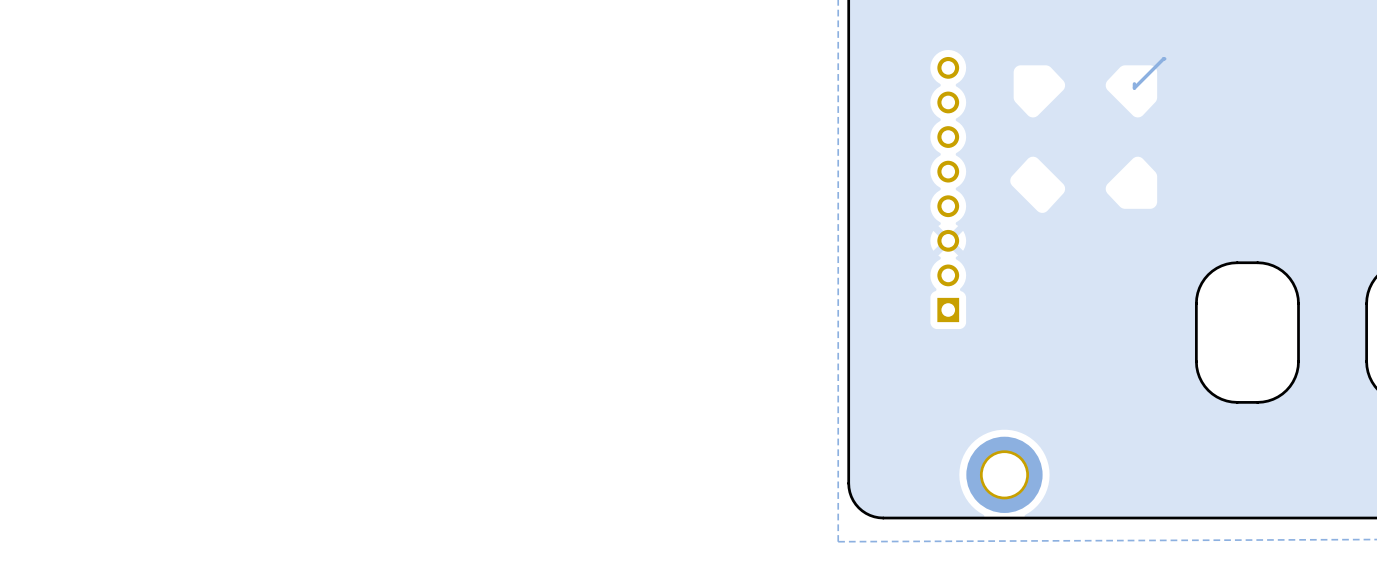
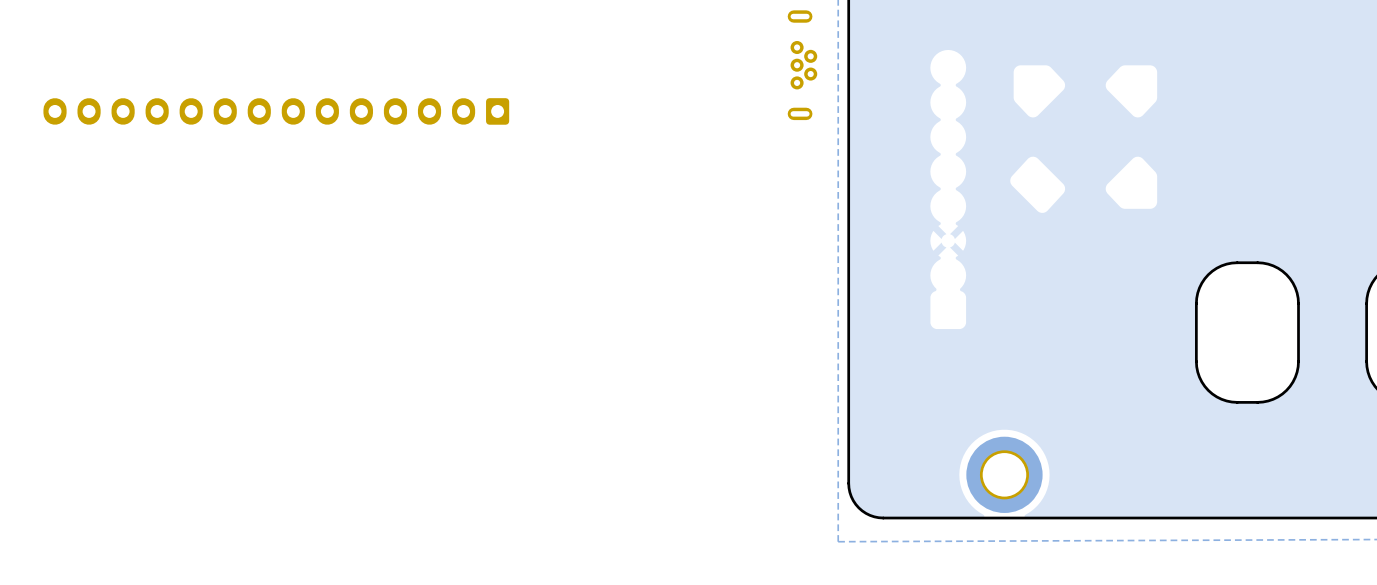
track: (1164, 58) (1134, 88) (1134, 83) -> none
part: none -> (802, 65)
part: none -> (276, 111)
part: (948, 189) -> none

